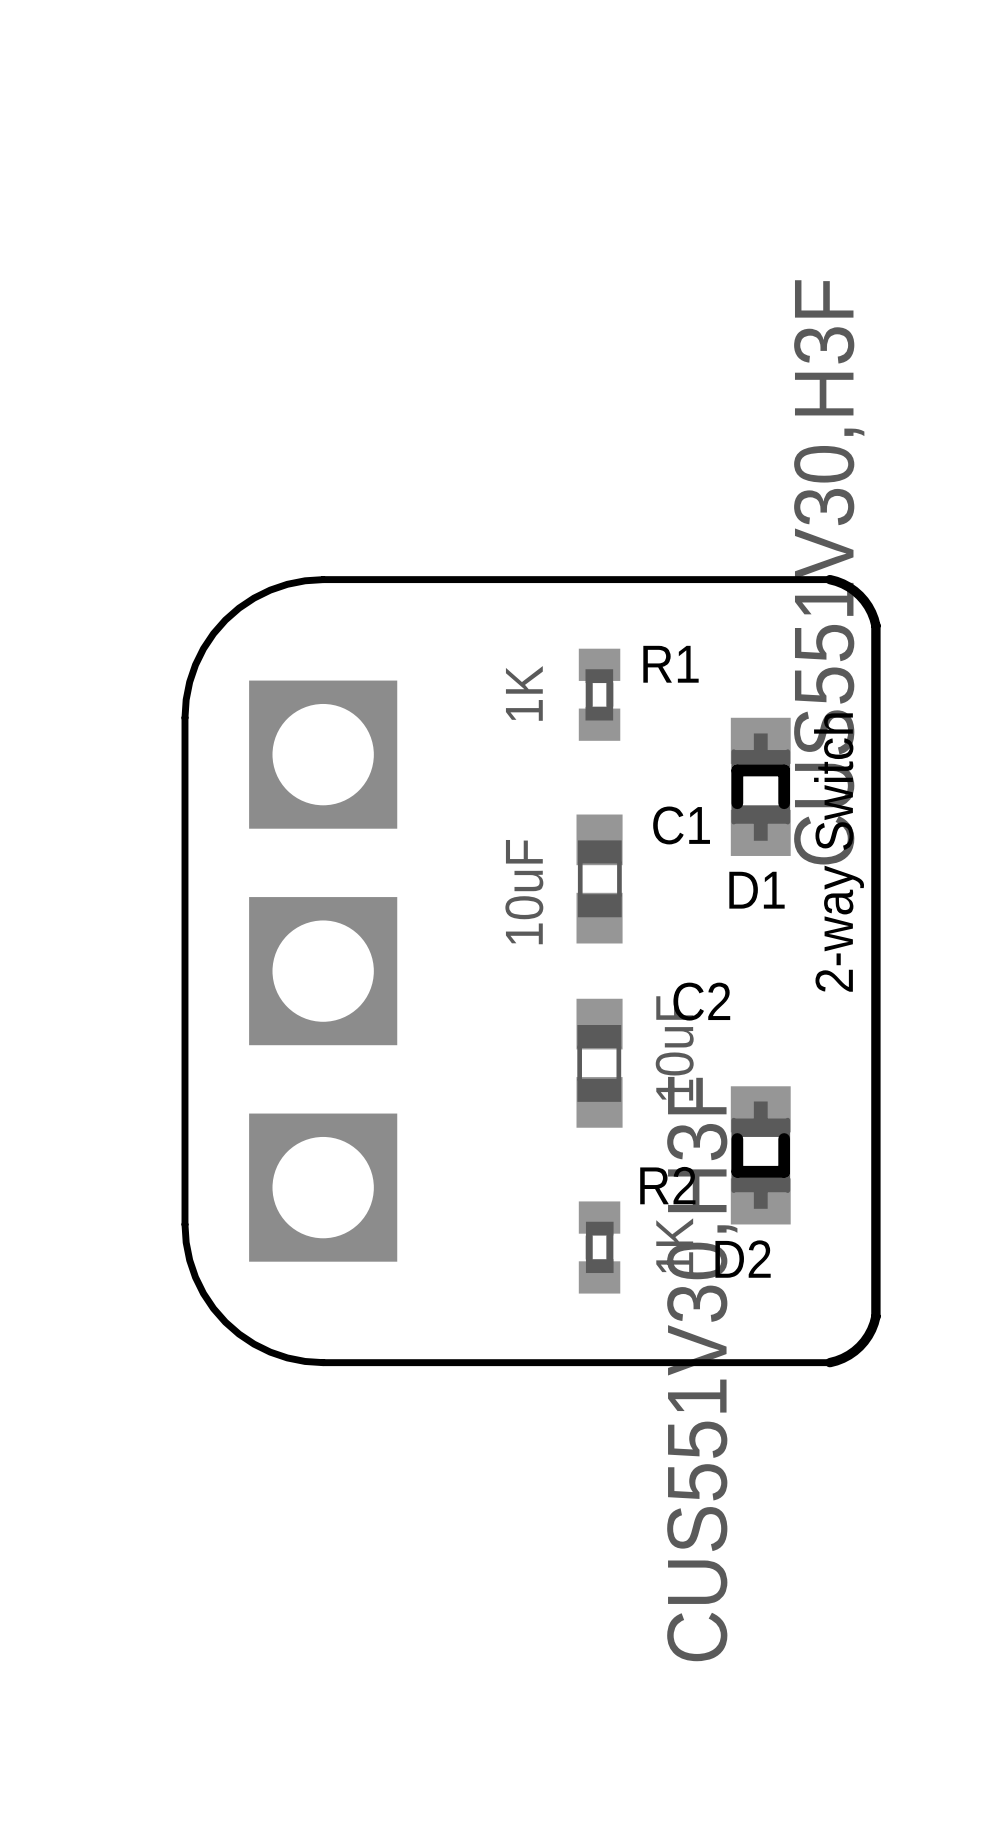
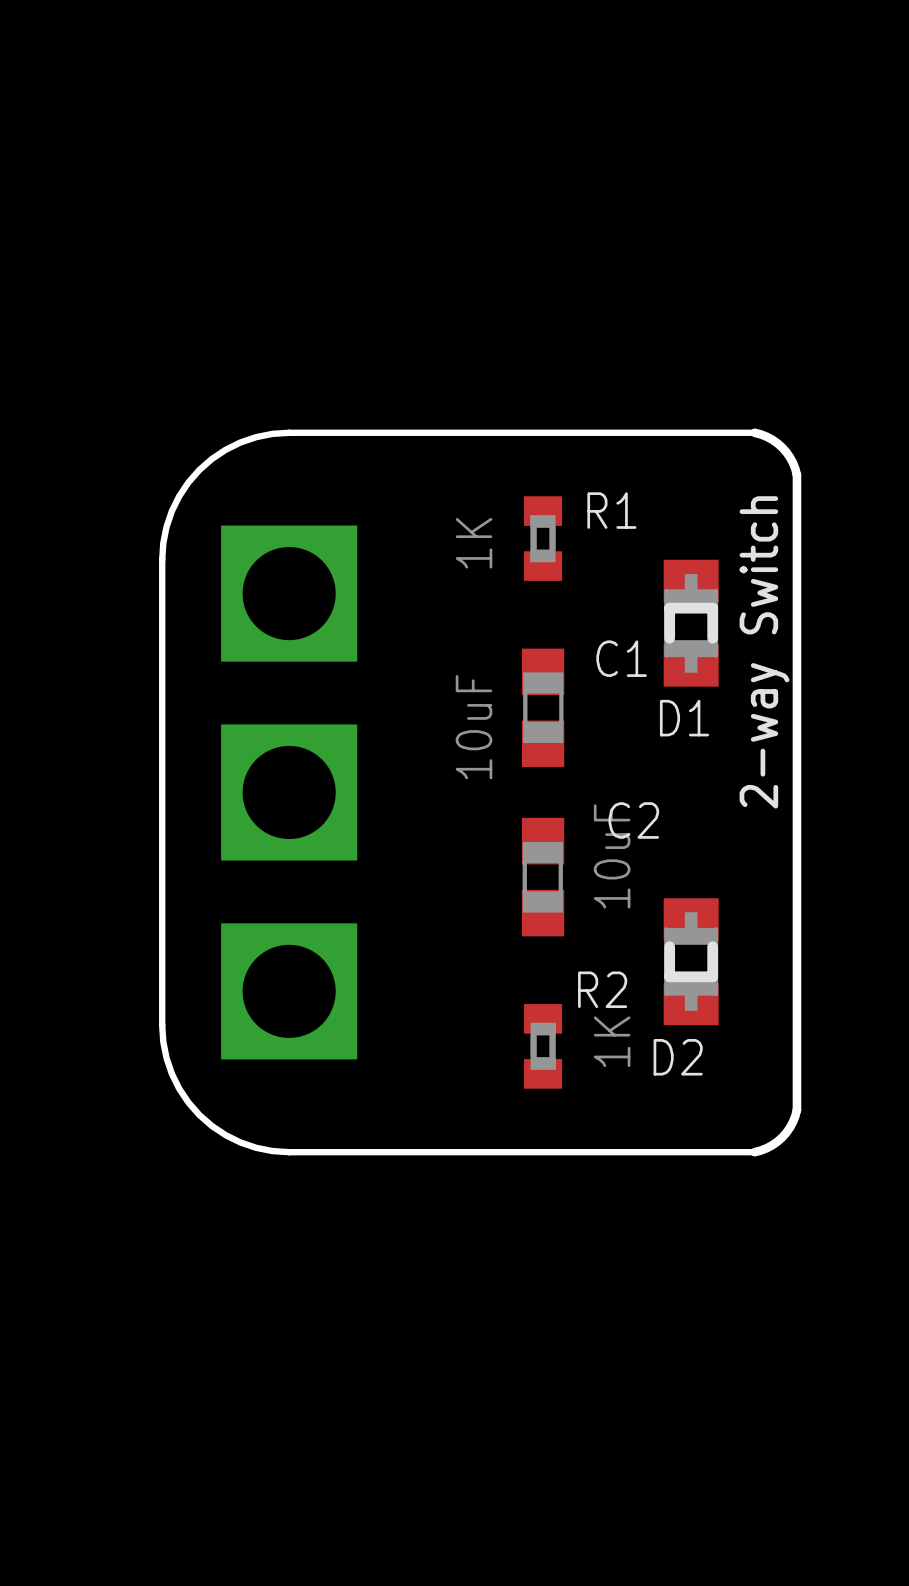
D1 value: CUS551V30,H3F (829, 572) -> none
D2 value: CUS551V30,H3F (702, 1369) -> none

